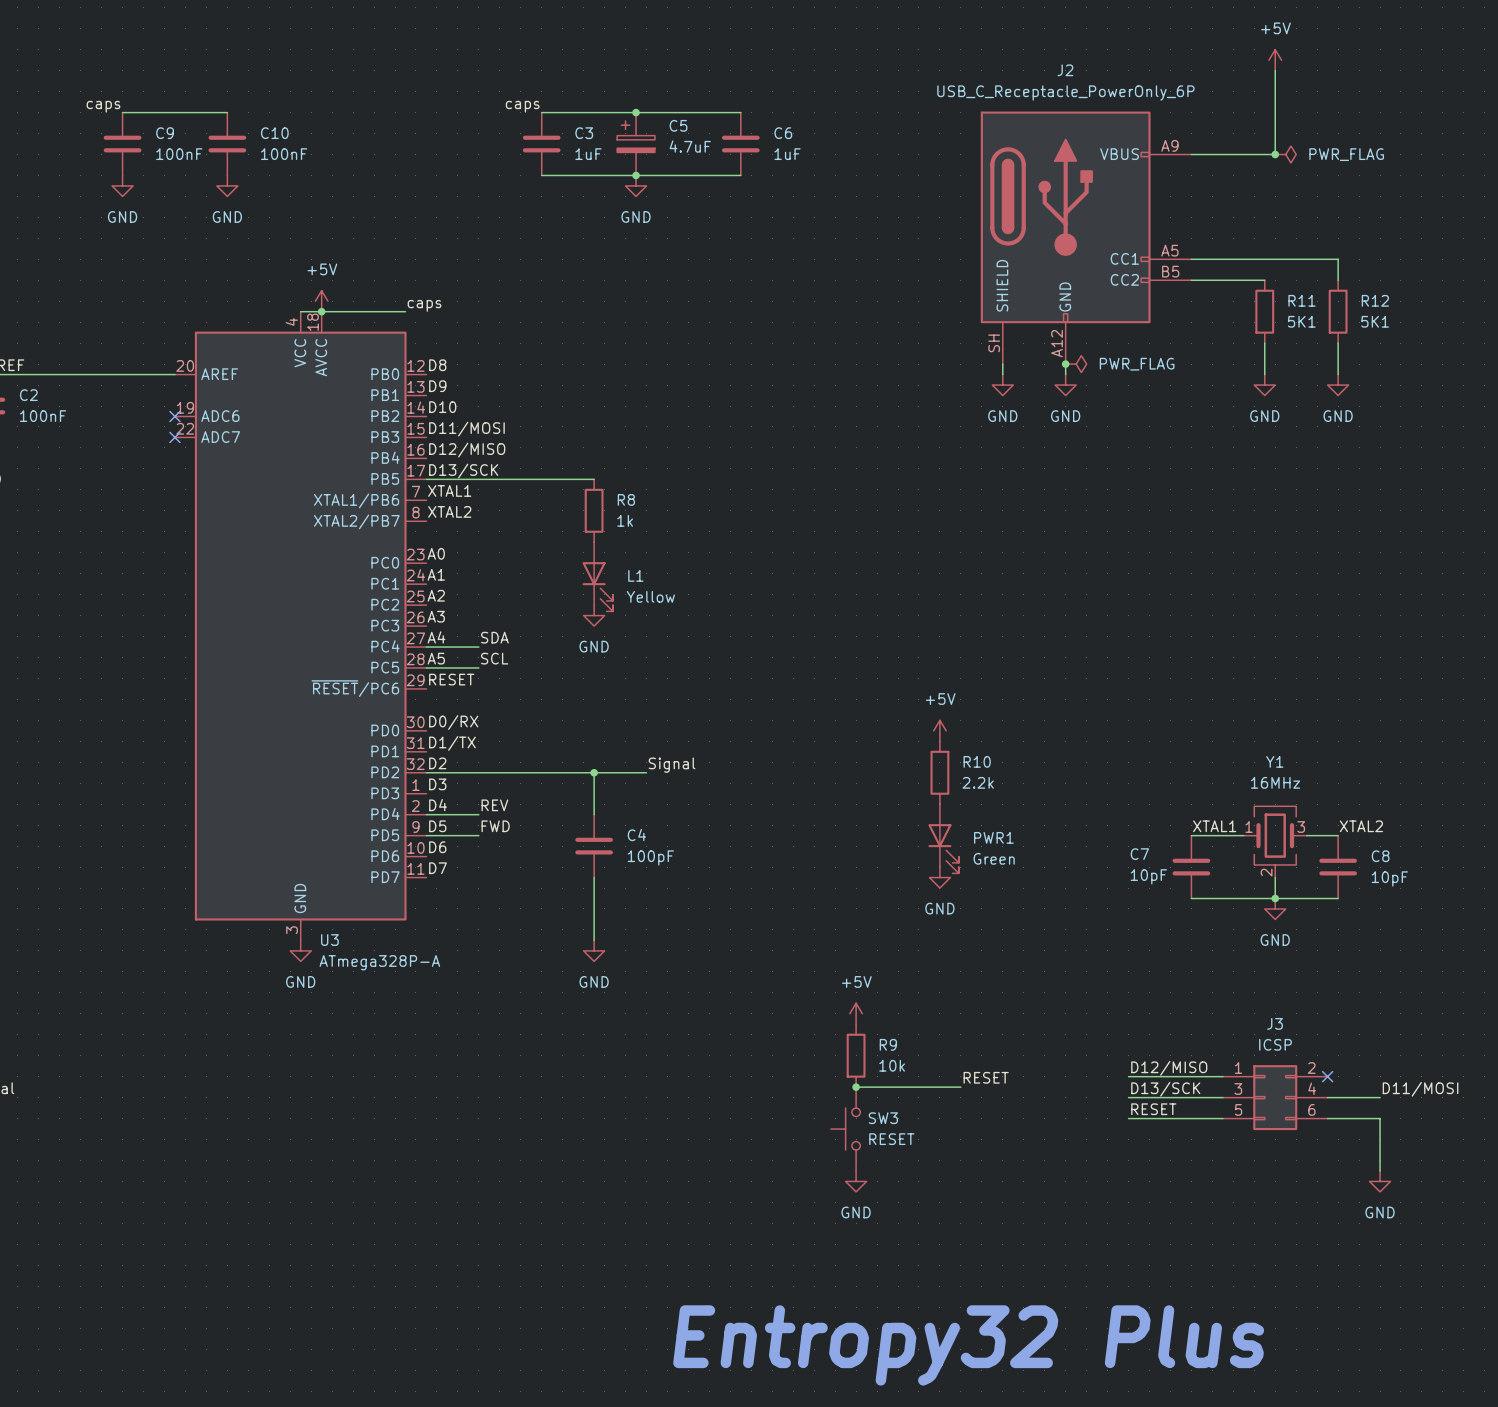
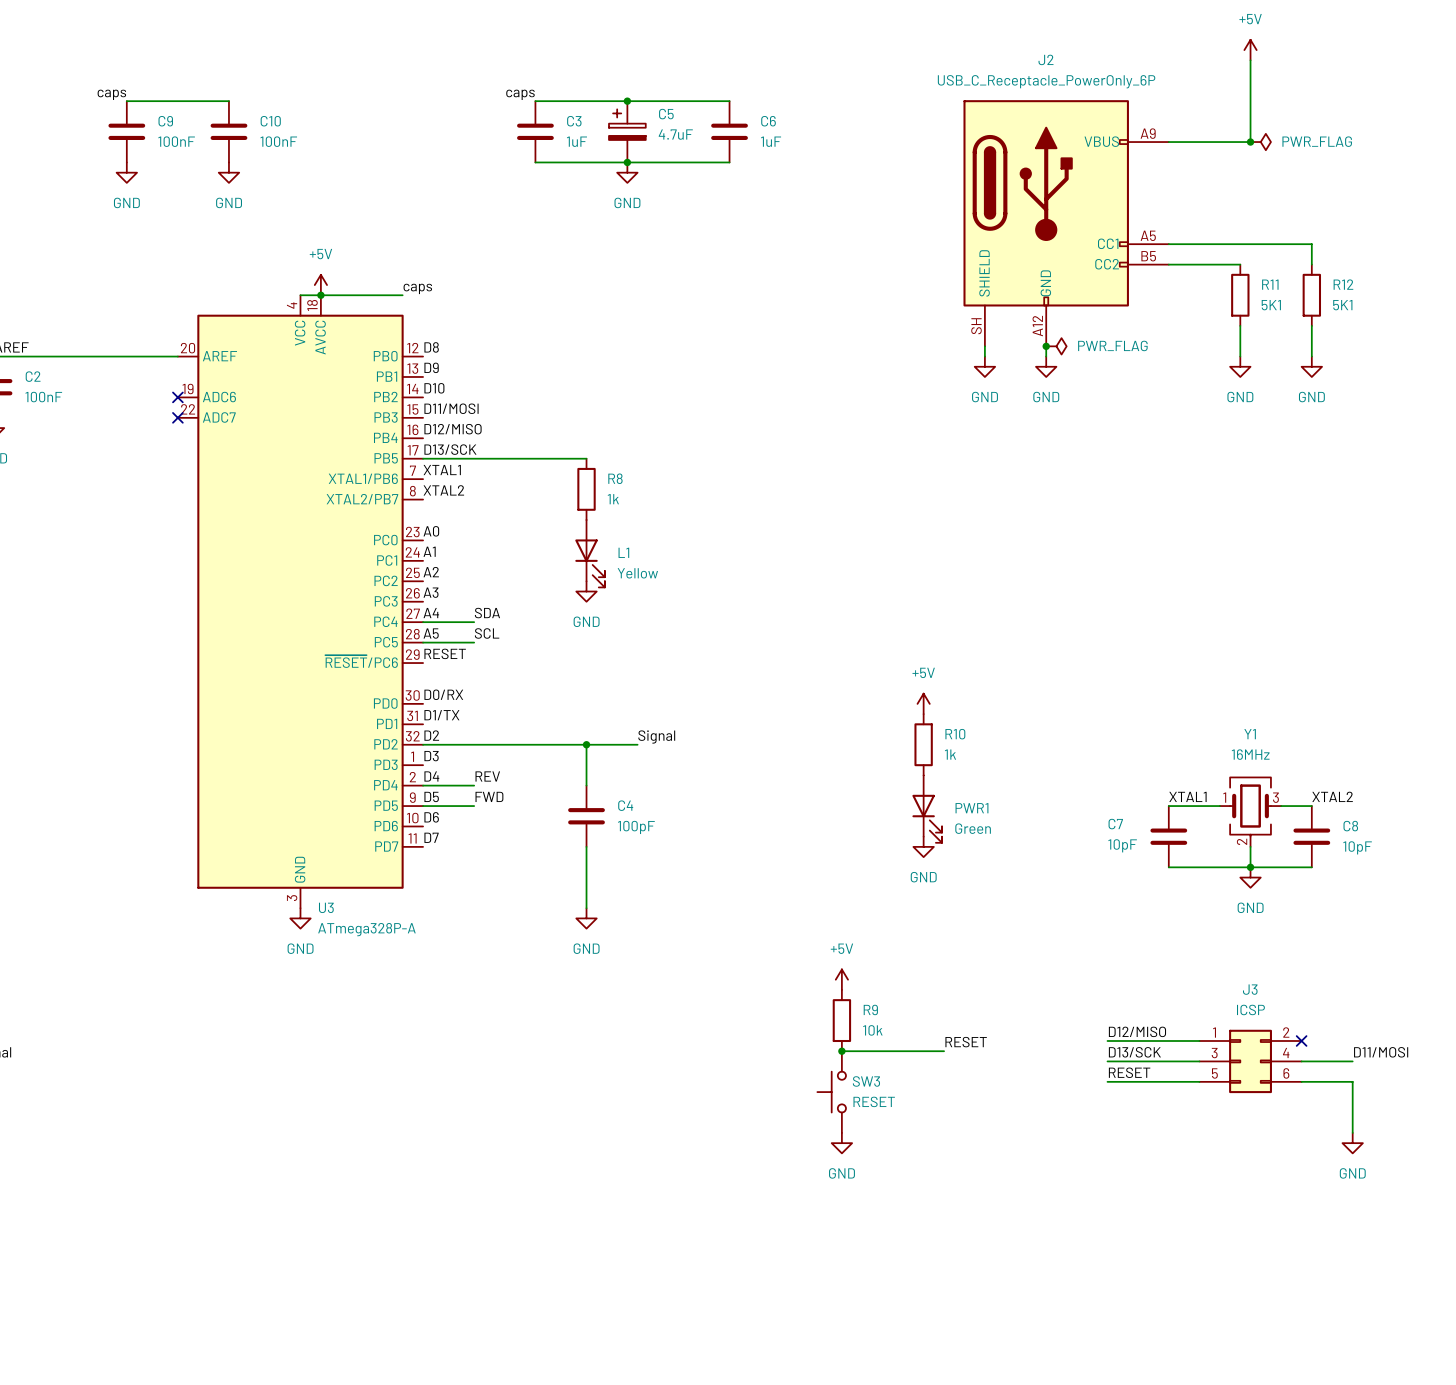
R10 value: 2.2k (978, 782) -> 1k (950, 754)
text: Entropy32 Plus (968, 1345) -> none

